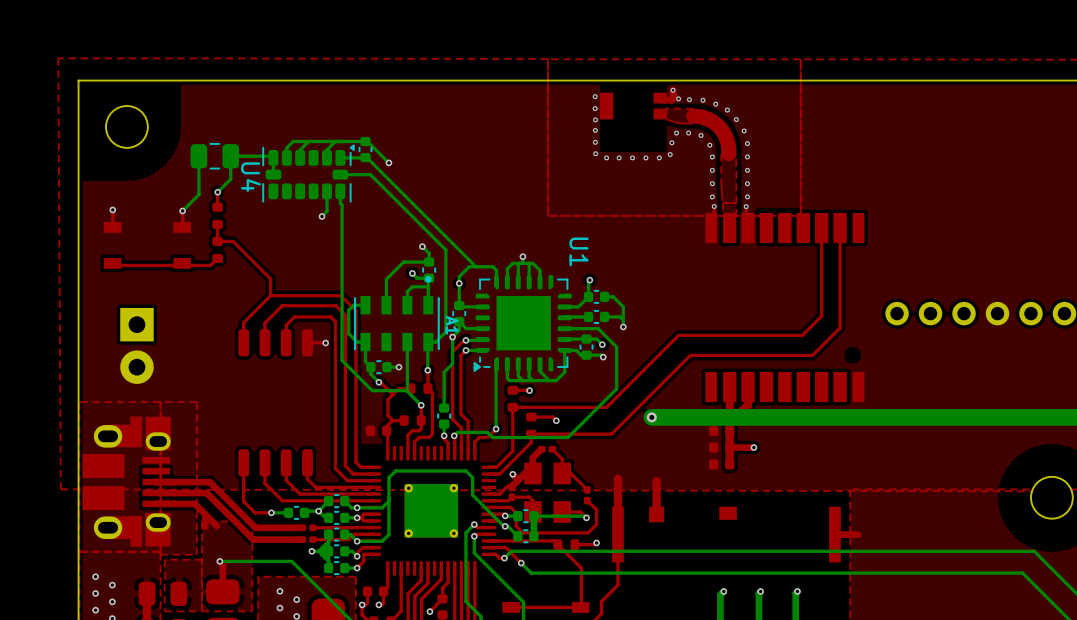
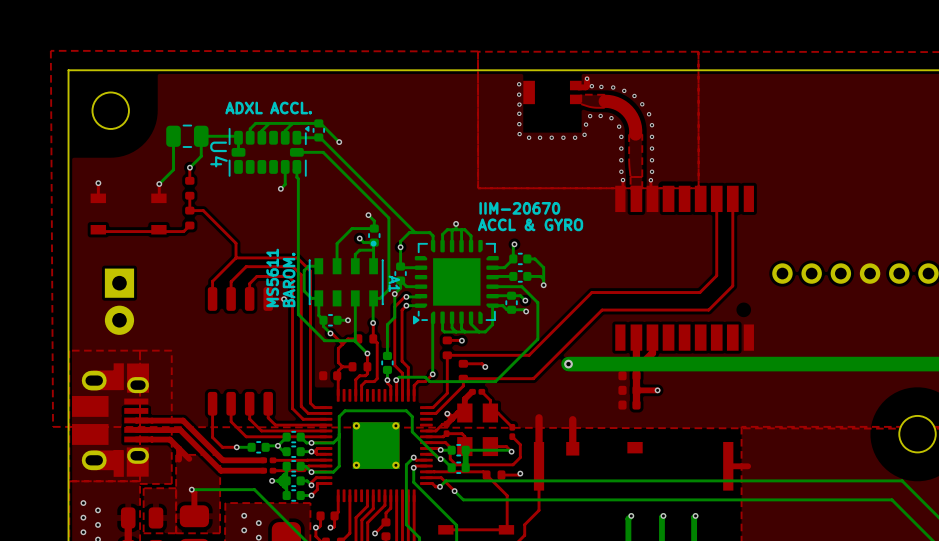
text: none -> ADXL ACCL. (268, 108)
text: none -> IIM-20670 (519, 208)
U1 name: U1 (579, 251) -> none
text: none -> ACCL & GYRO (530, 224)
text: none -> MS5611 (272, 277)
text: none -> BAROM. (289, 279)

